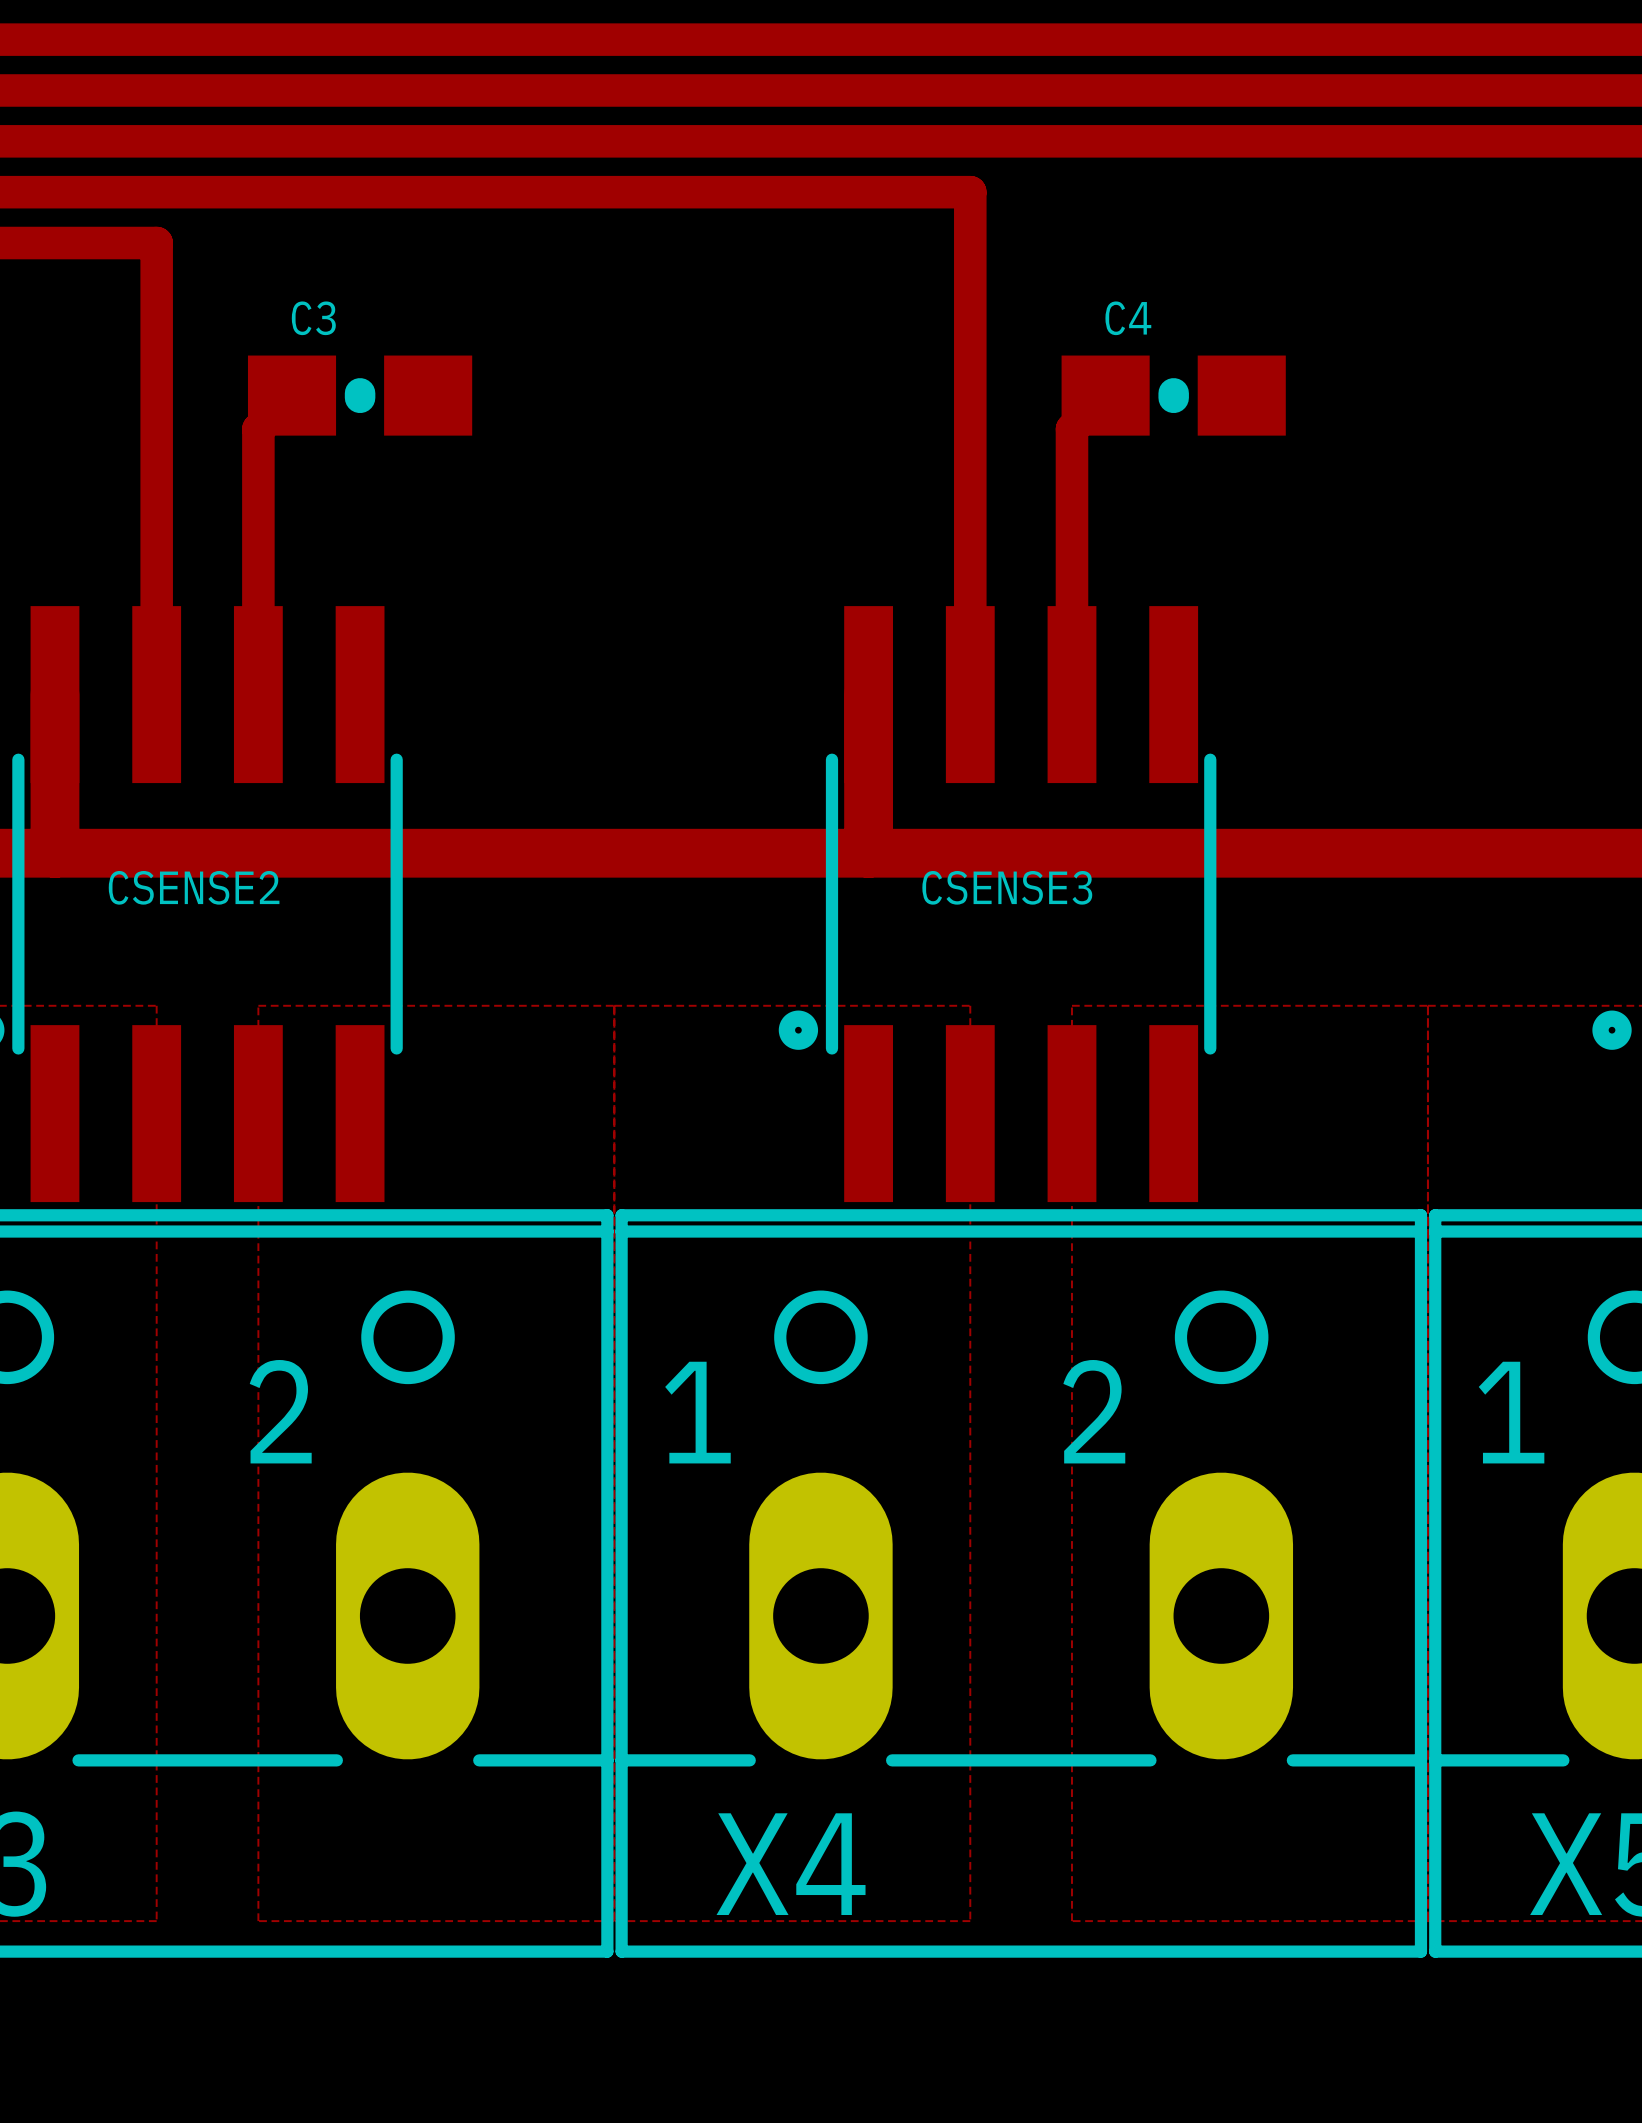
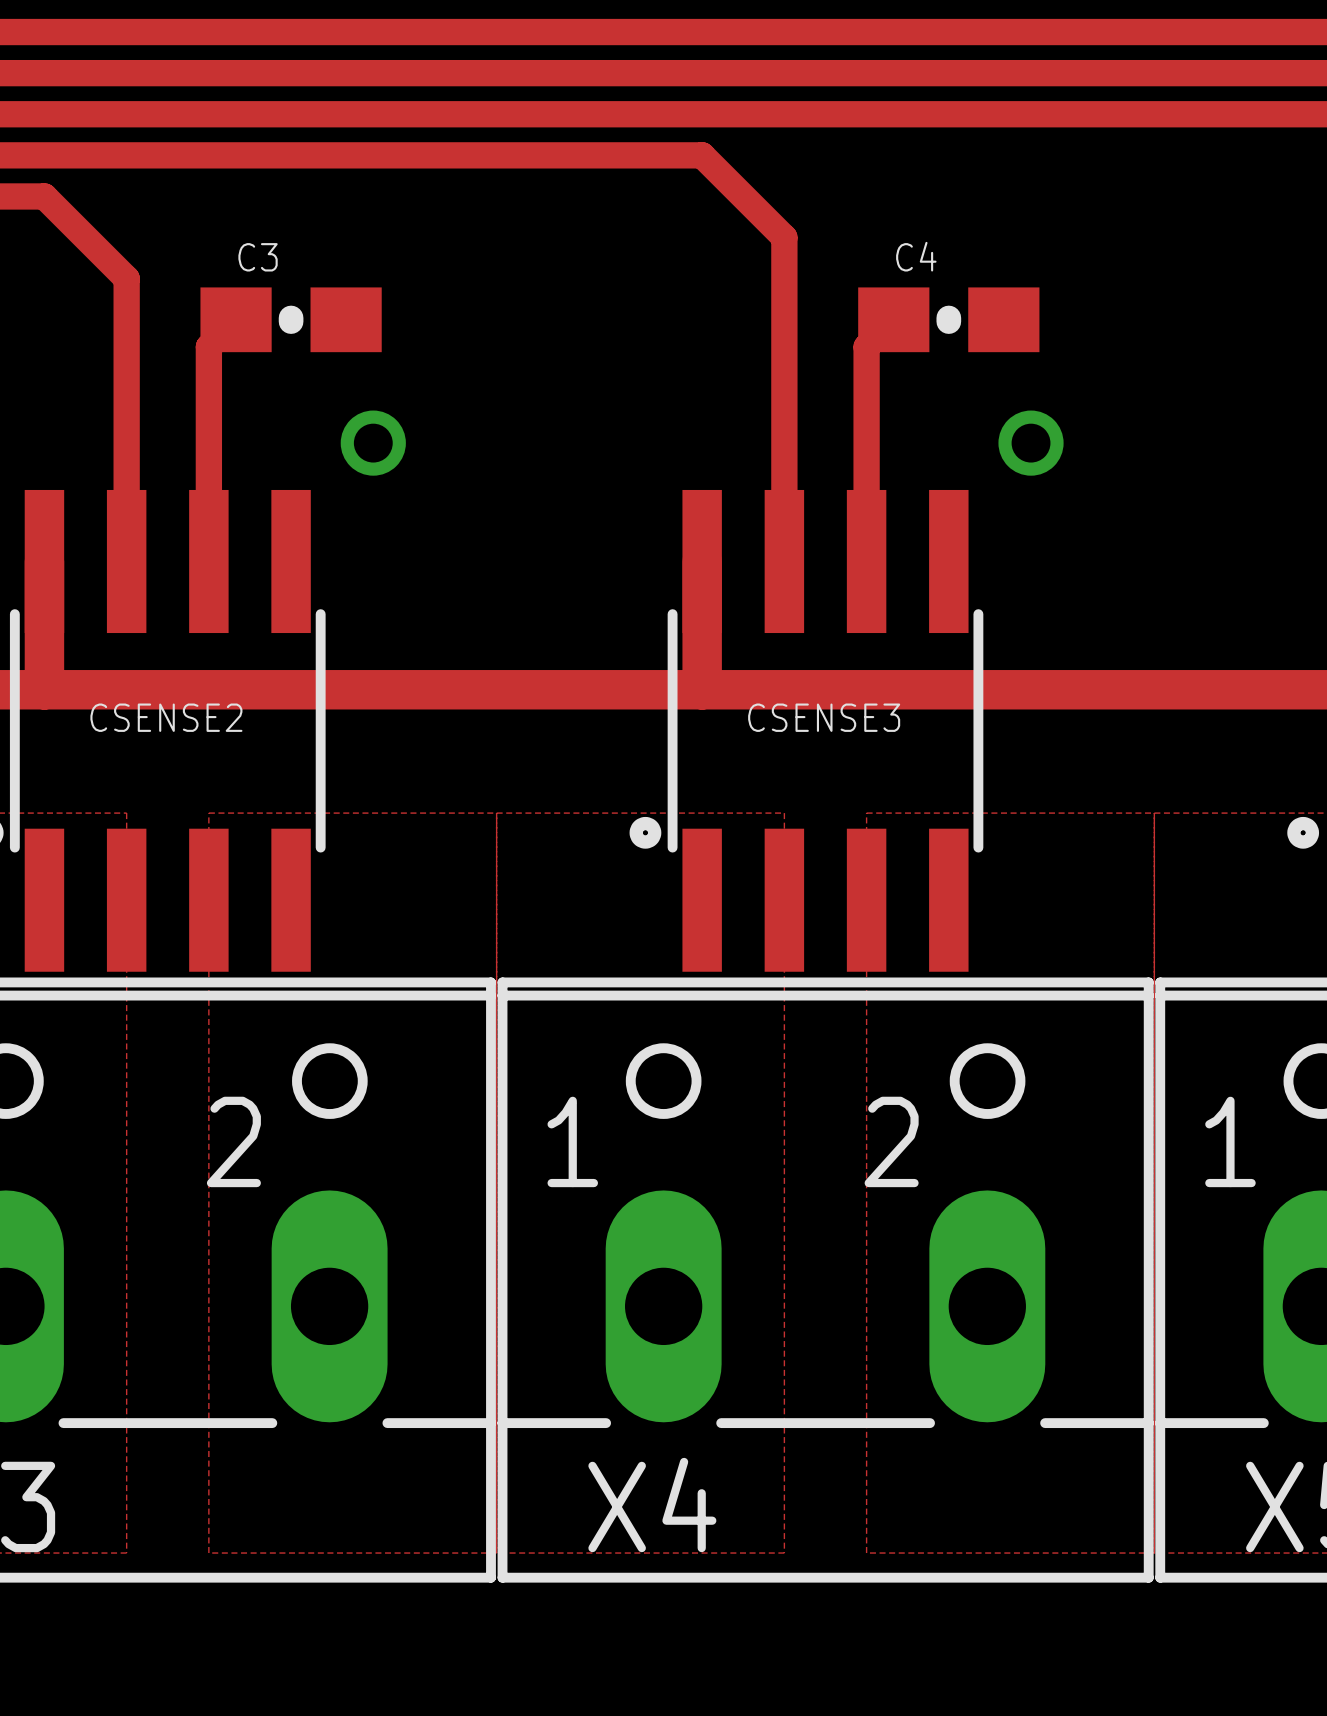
top track: (868, 192) (970, 192) (970, 293) -> (702, 155) (784, 237)
top track: (54, 243) (156, 243) (156, 344) -> (44, 196) (126, 278)
via: none -> (373, 443)
via: none -> (1031, 443)

